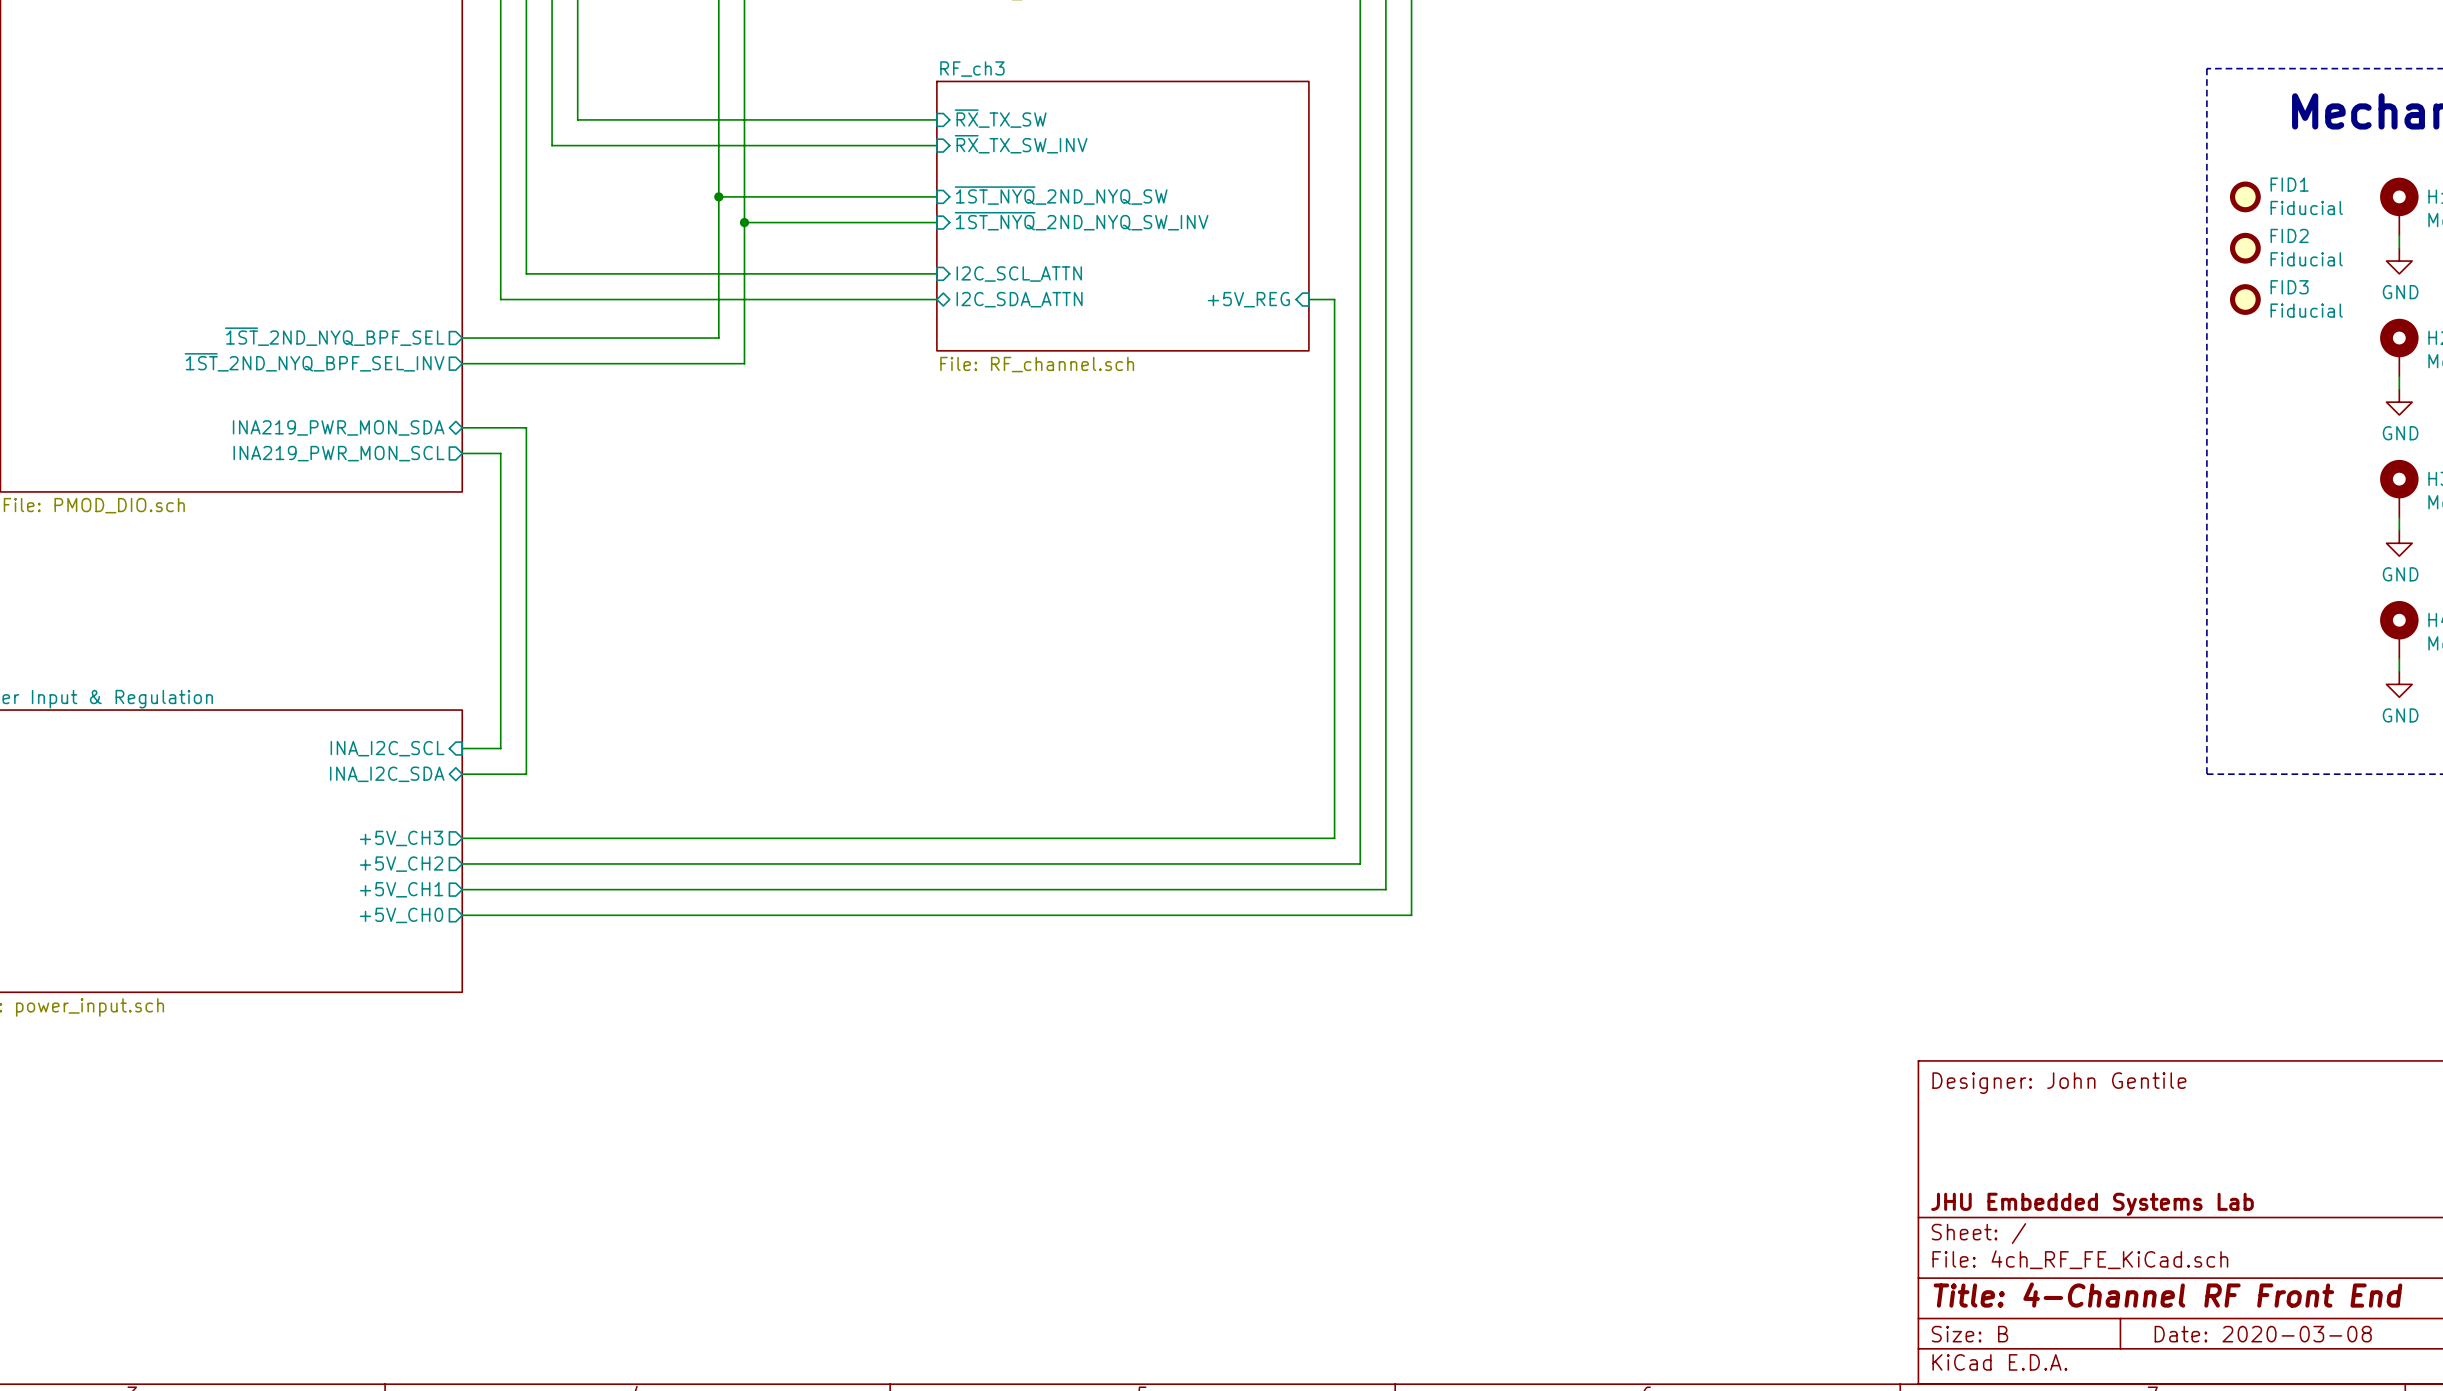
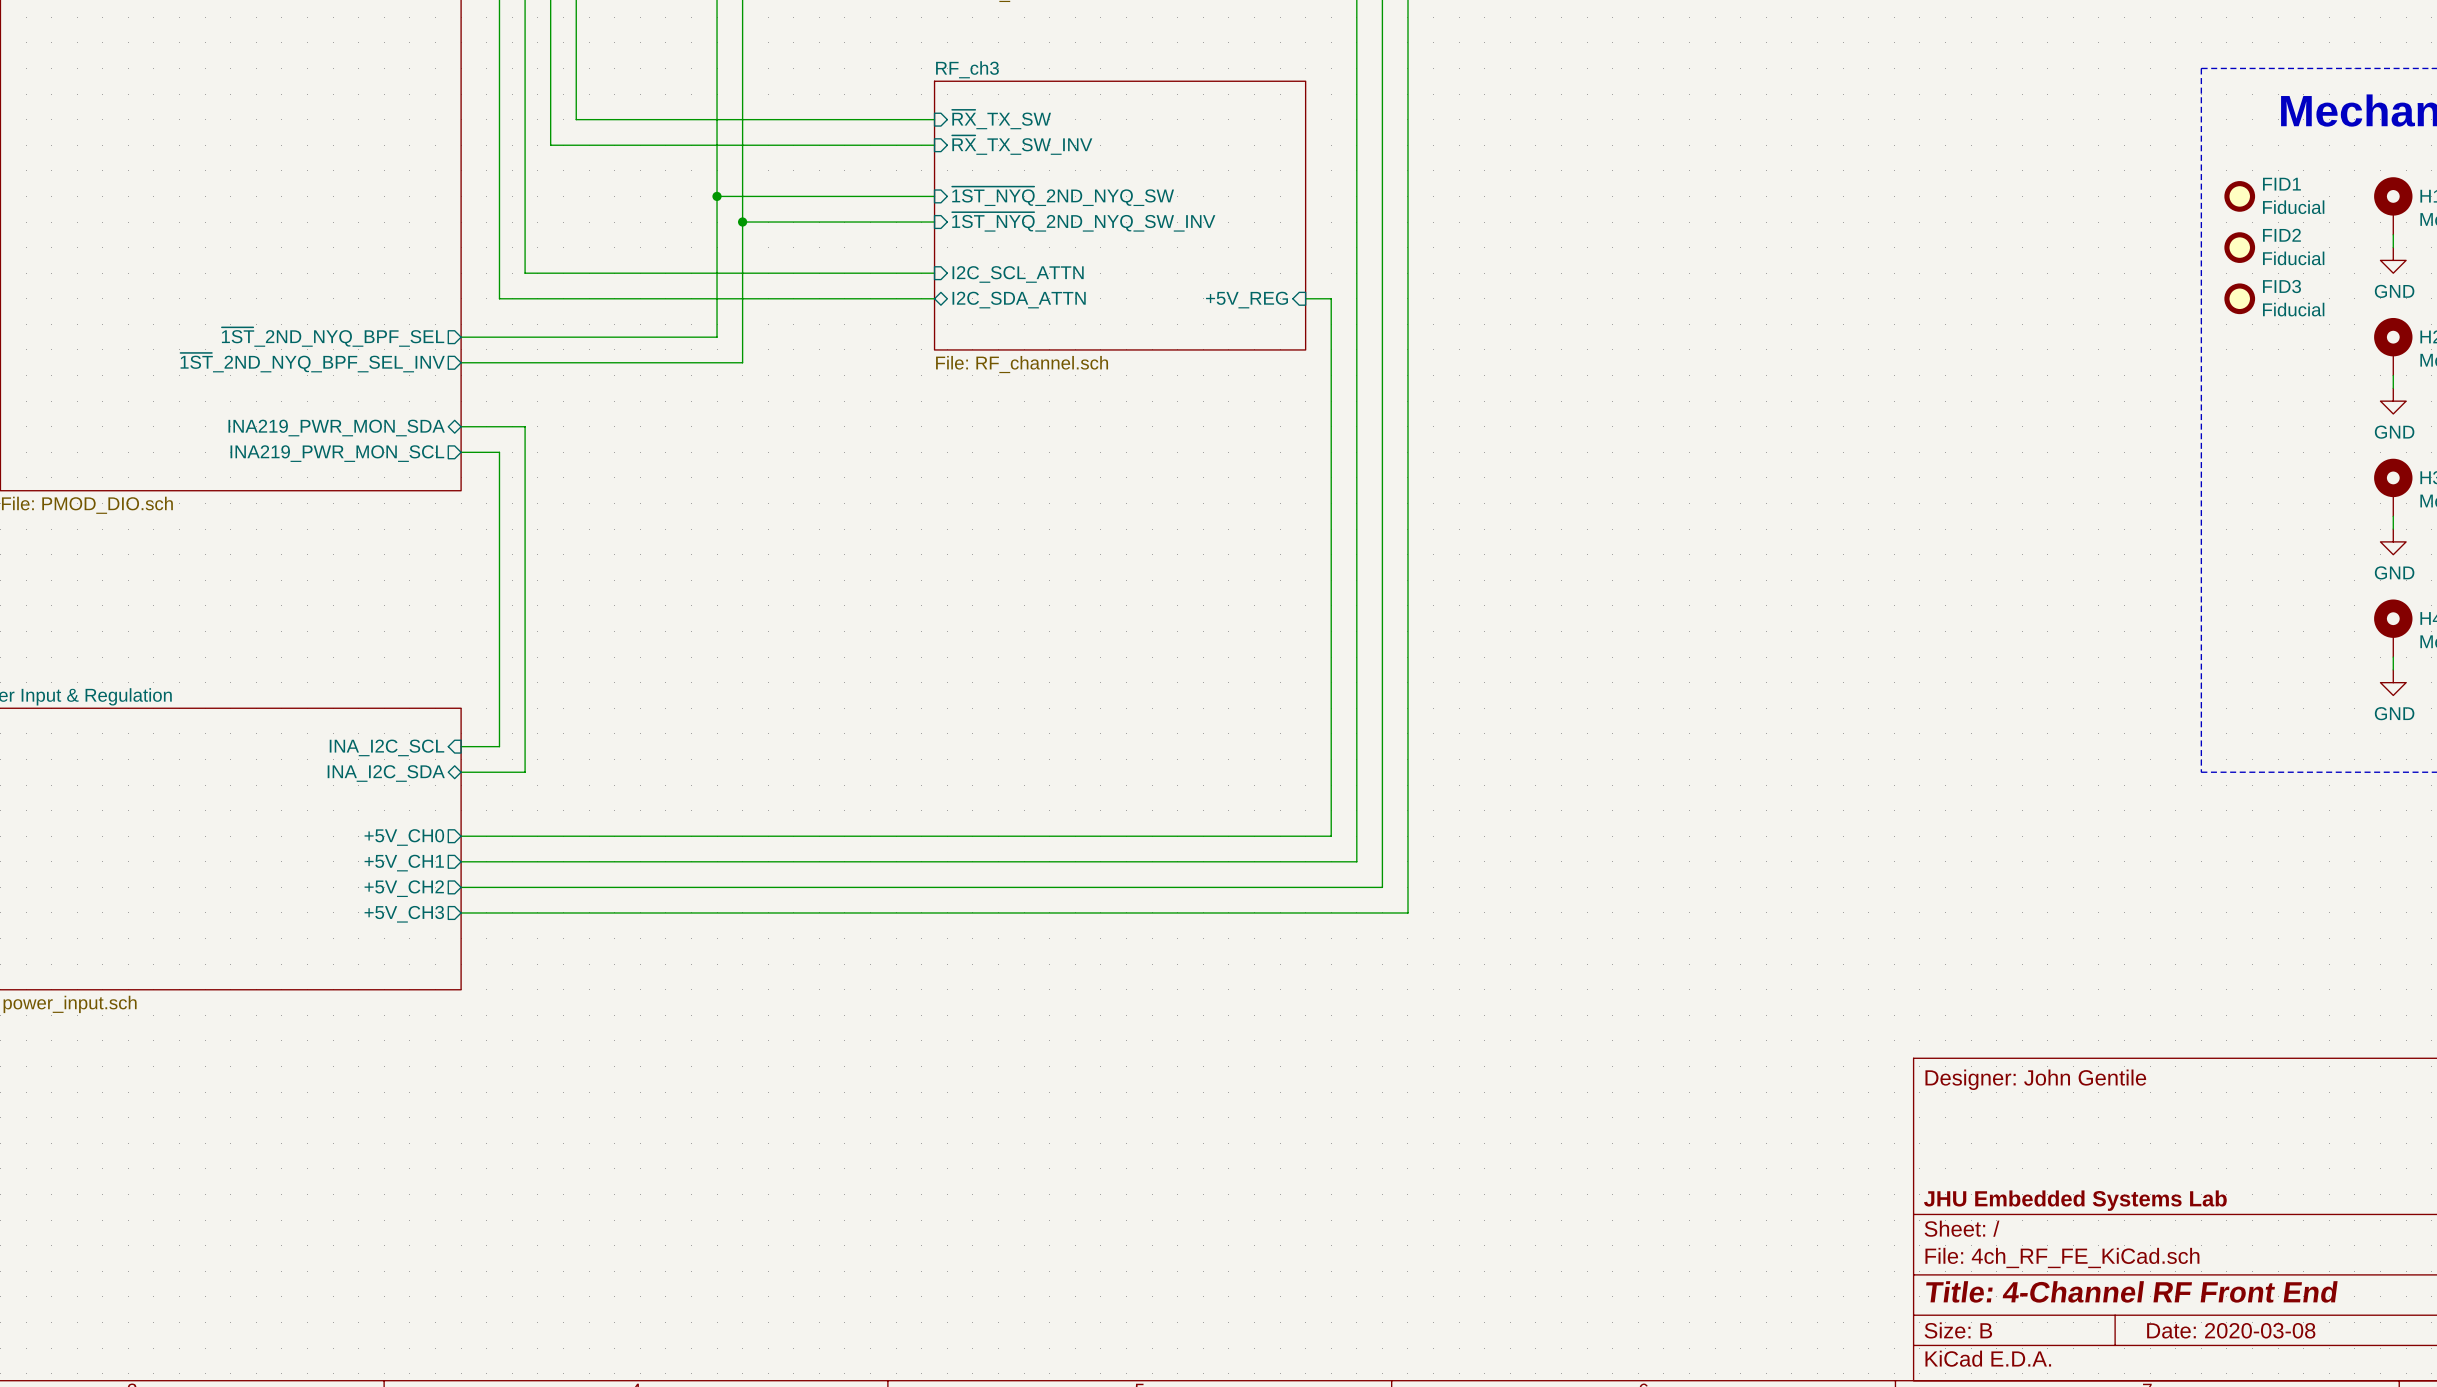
sheet pin: +5V_CH3 (401, 838) -> +5V_CH0 (404, 837)
sheet pin: +5V_CH2 (401, 864) -> +5V_CH1 (404, 863)
sheet pin: +5V_CH1 (401, 889) -> +5V_CH2 (404, 888)
sheet pin: +5V_CH0 (401, 915) -> +5V_CH3 (404, 914)

